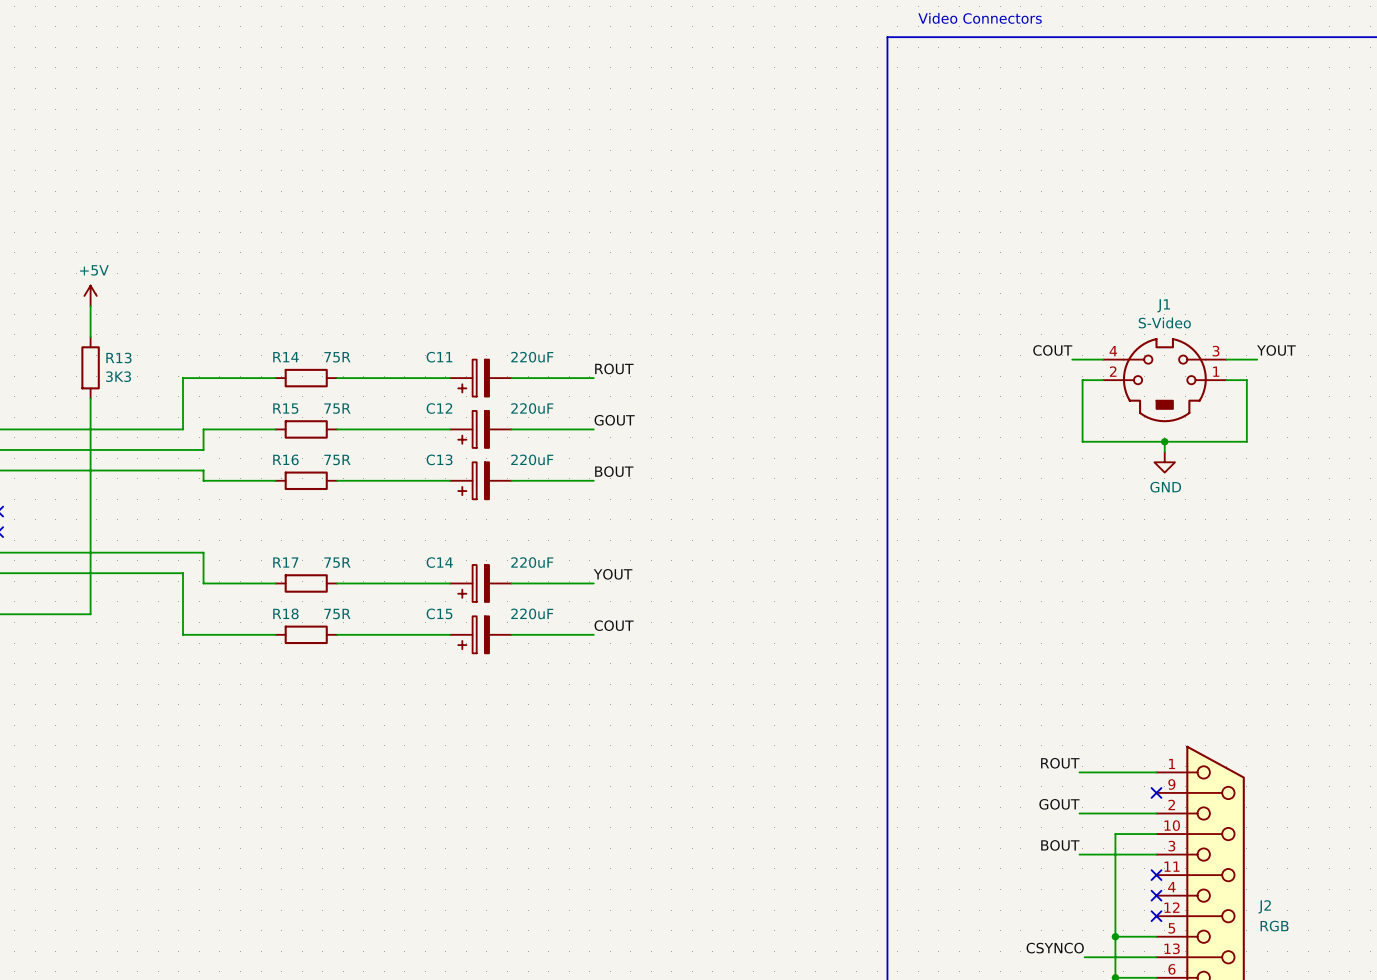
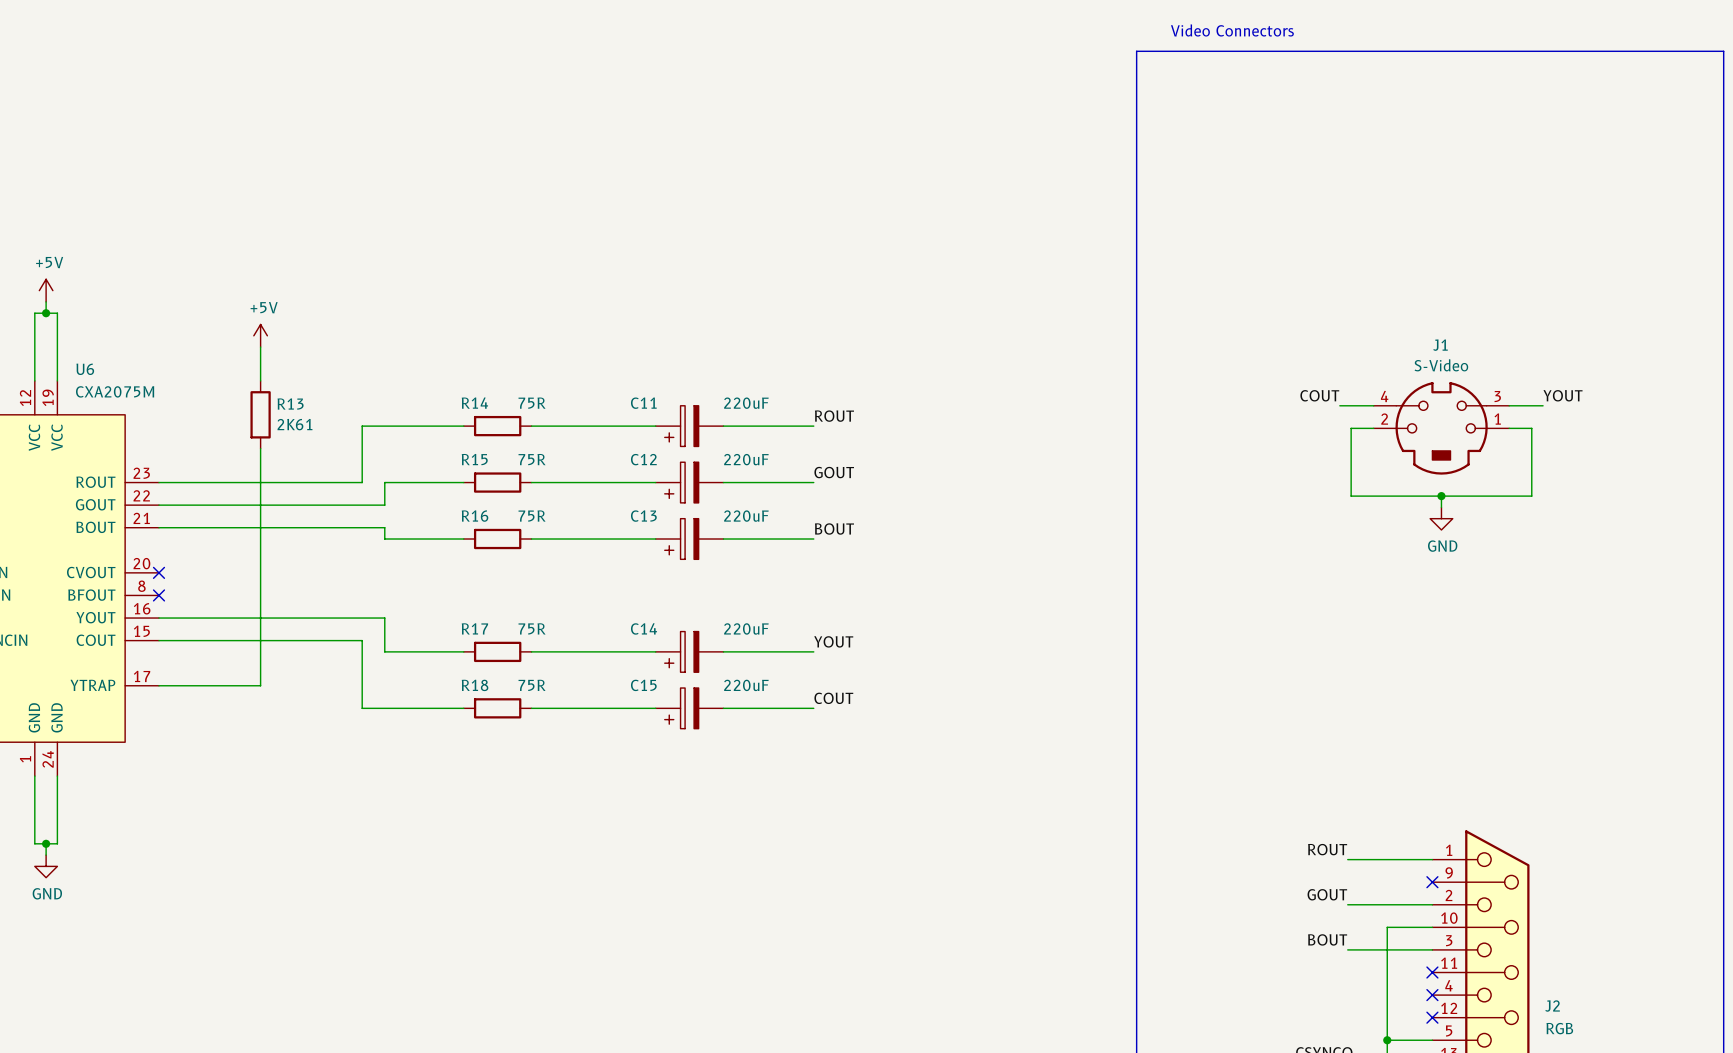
R13 value: 3K3 (118, 376) -> 2K61 (294, 424)

